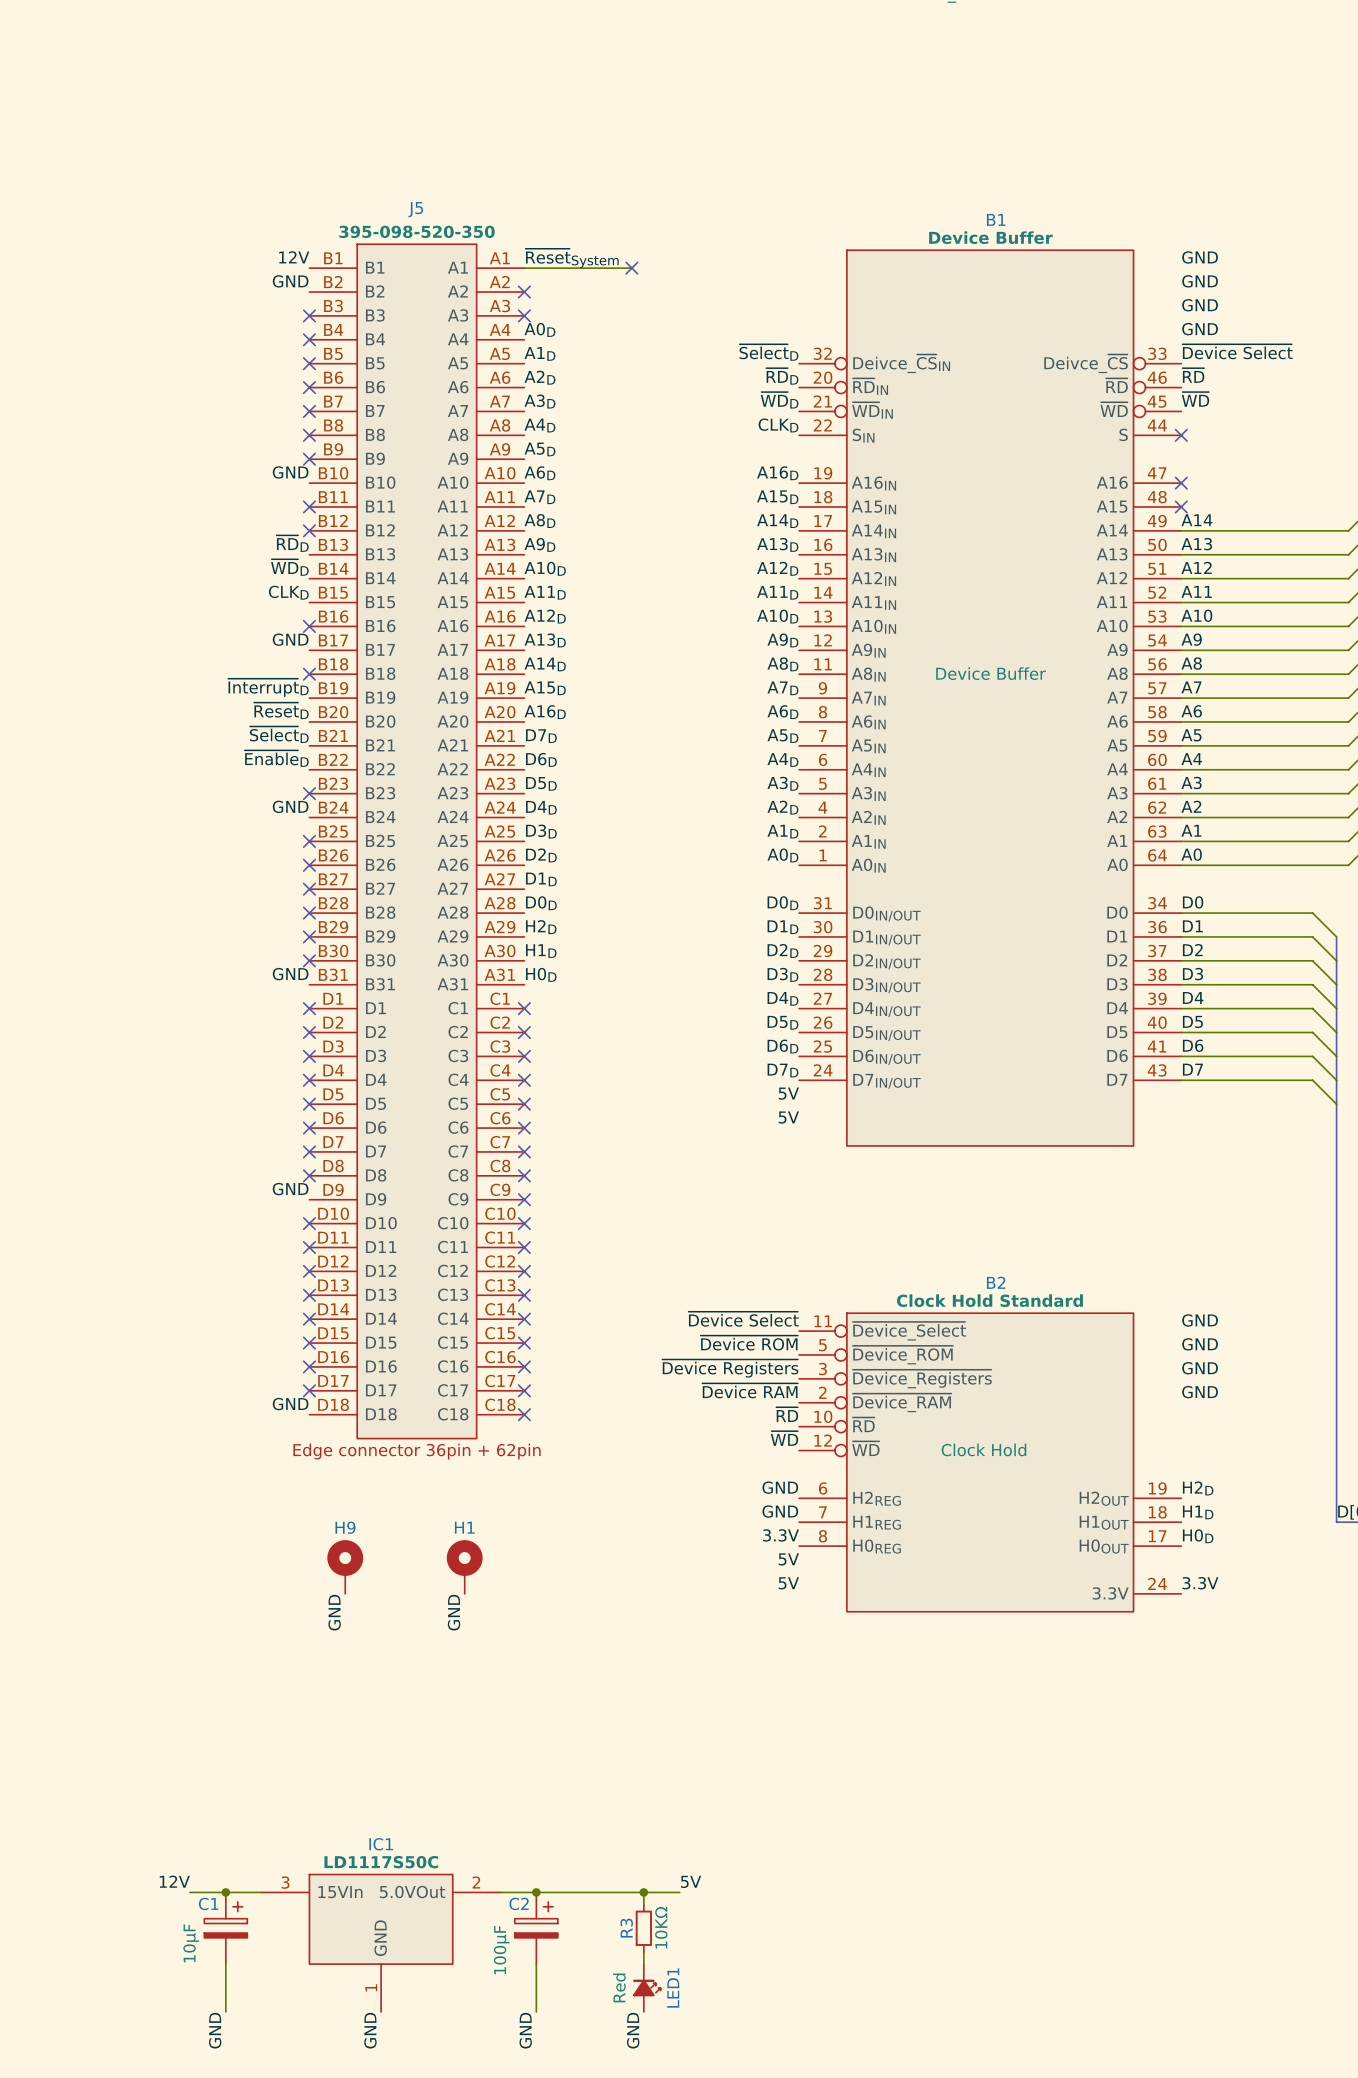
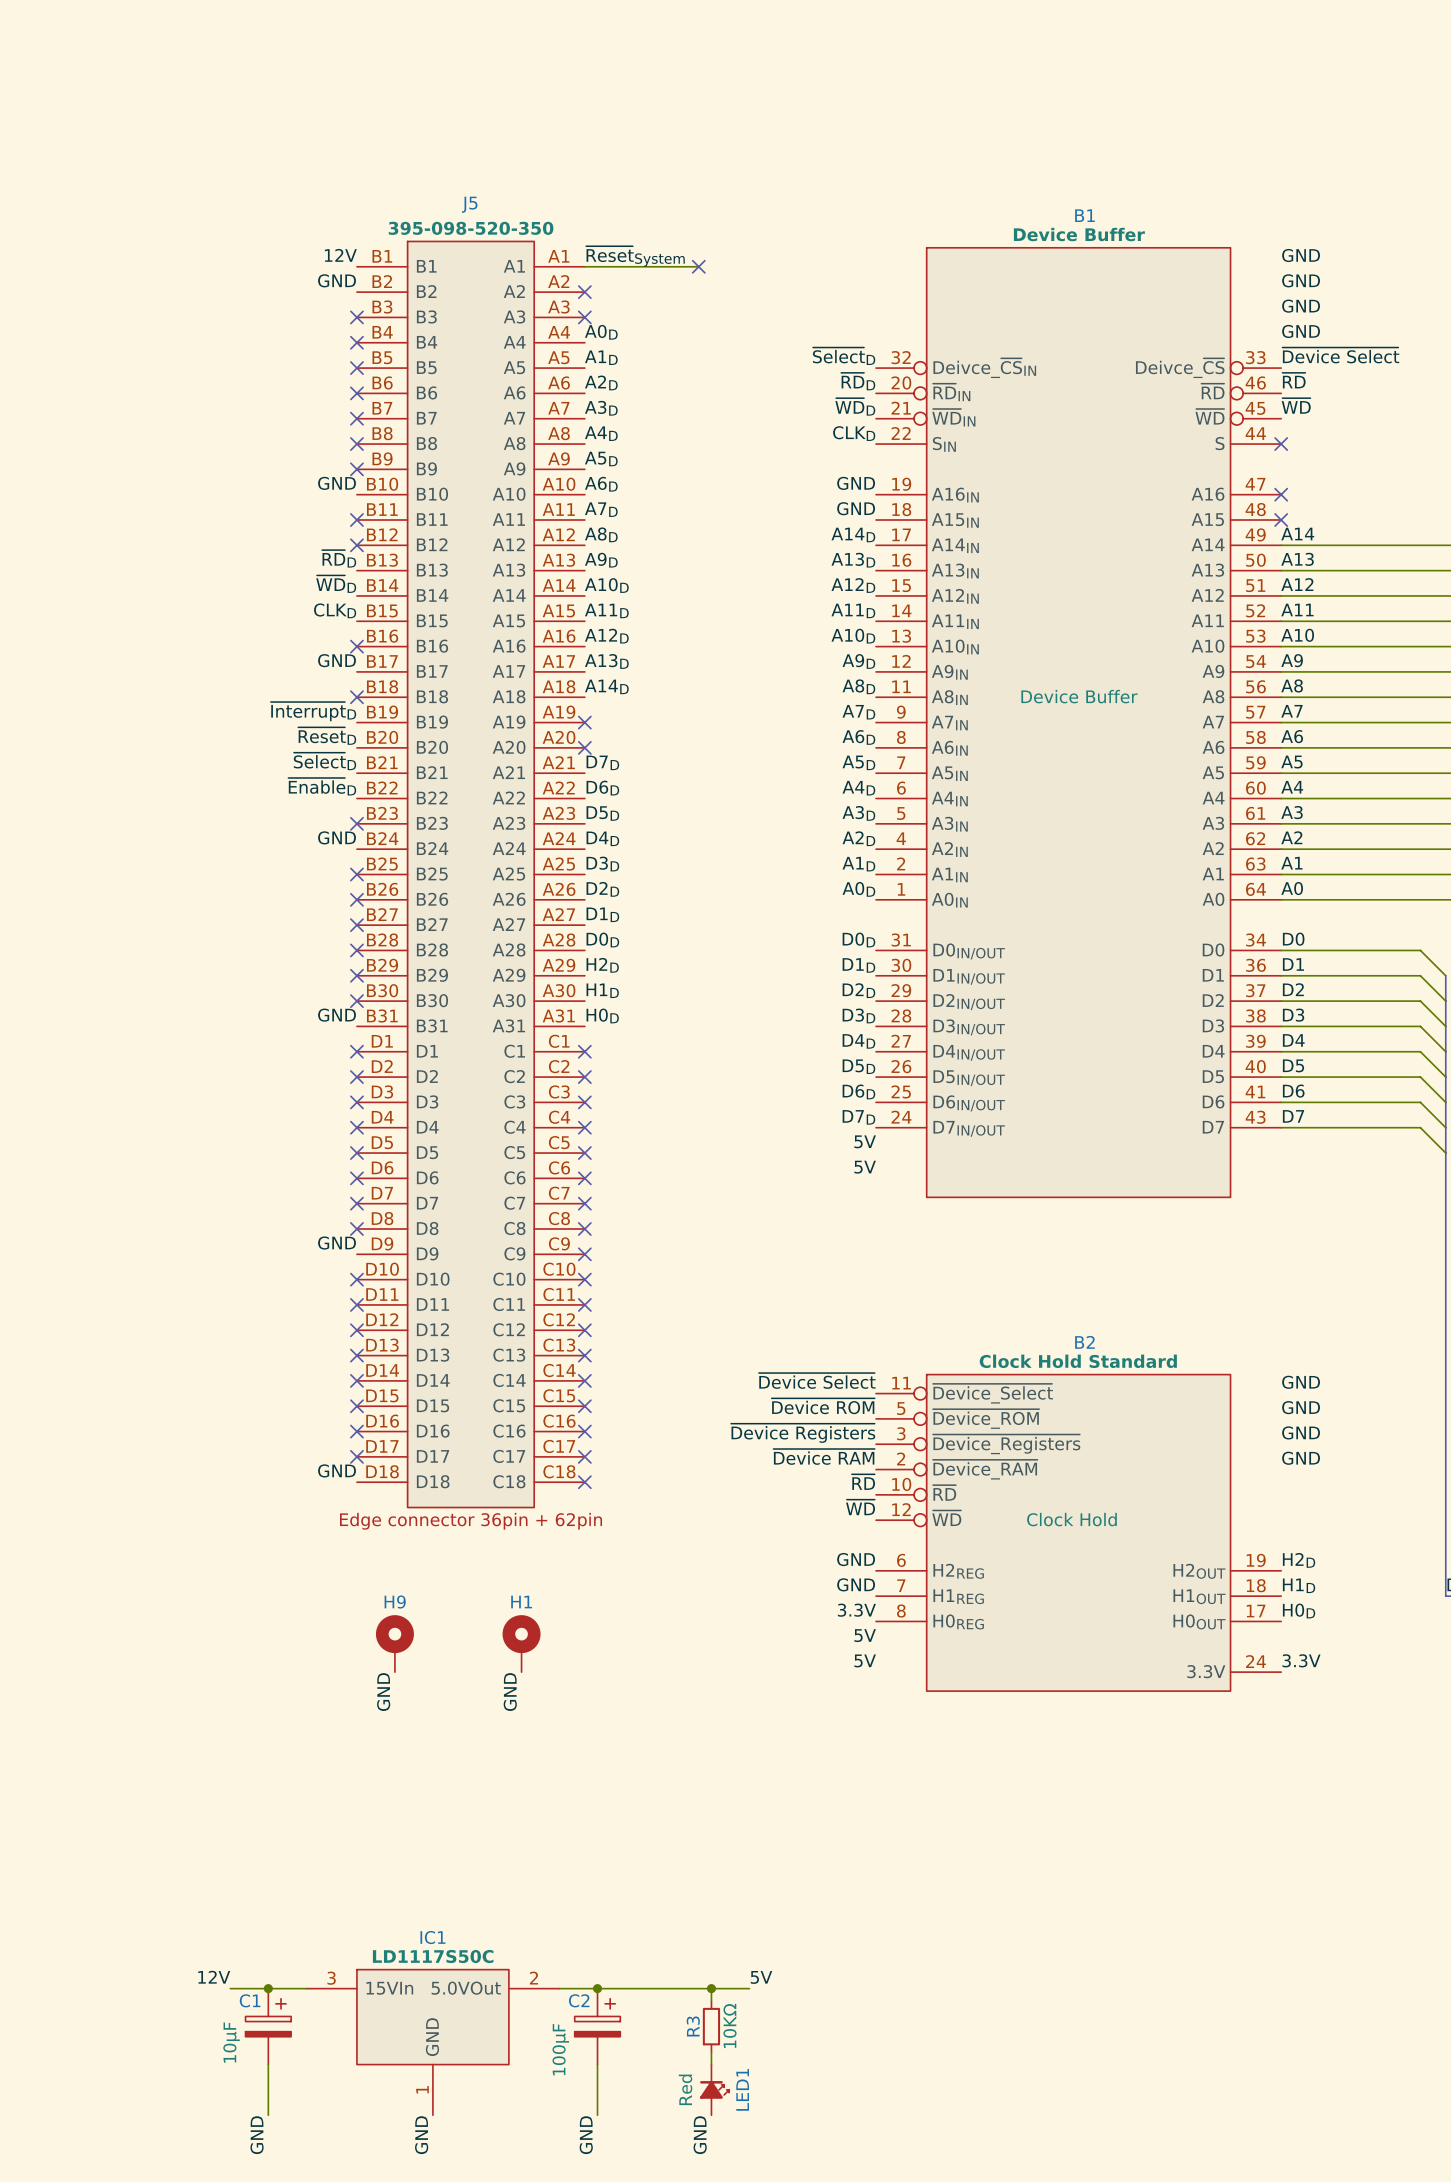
label: A16D (777, 473) -> GND (856, 483)
label: A15D (777, 497) -> GND (856, 508)
label: A15D (545, 688) -> none
no-connect mark: none -> (584, 722)
label: A16D (545, 712) -> none
no-connect mark: none -> (584, 747)

